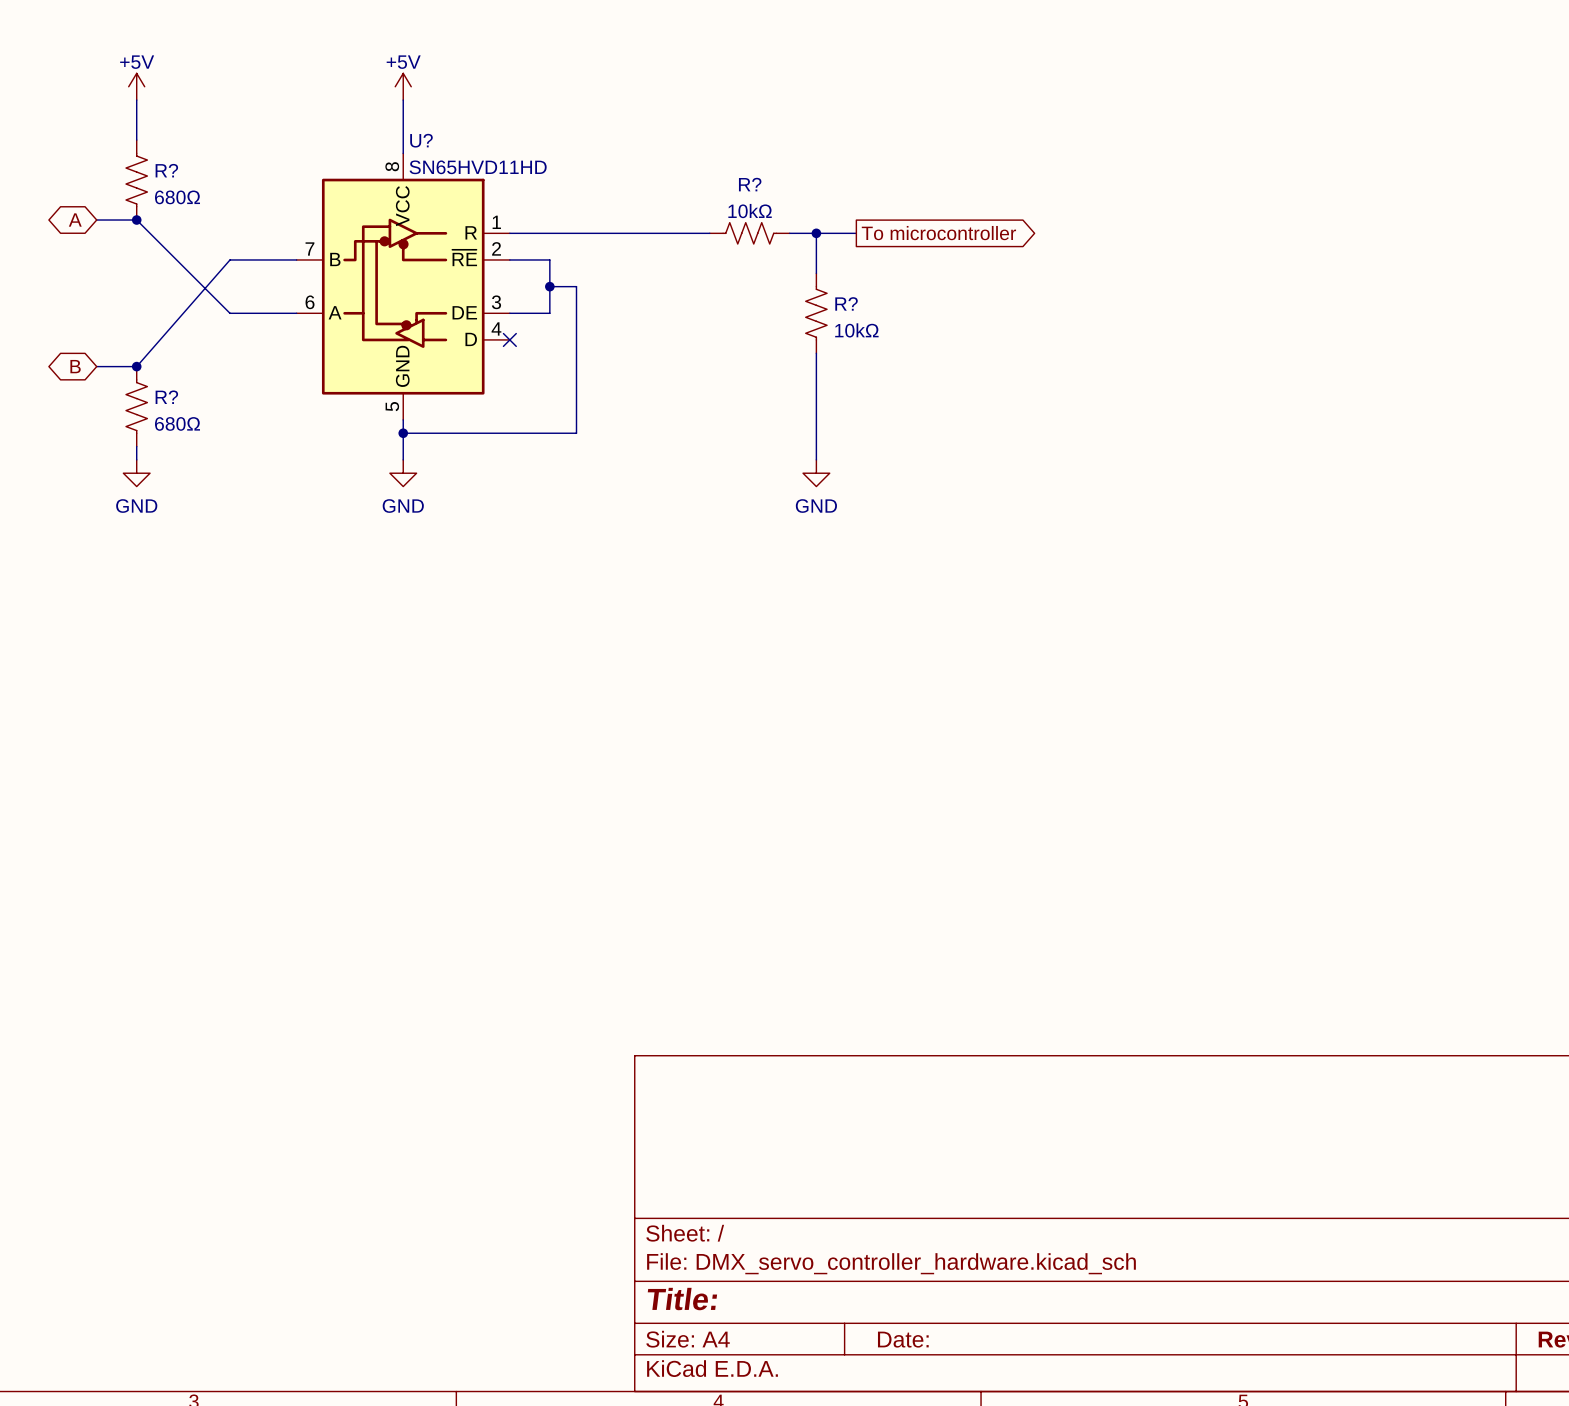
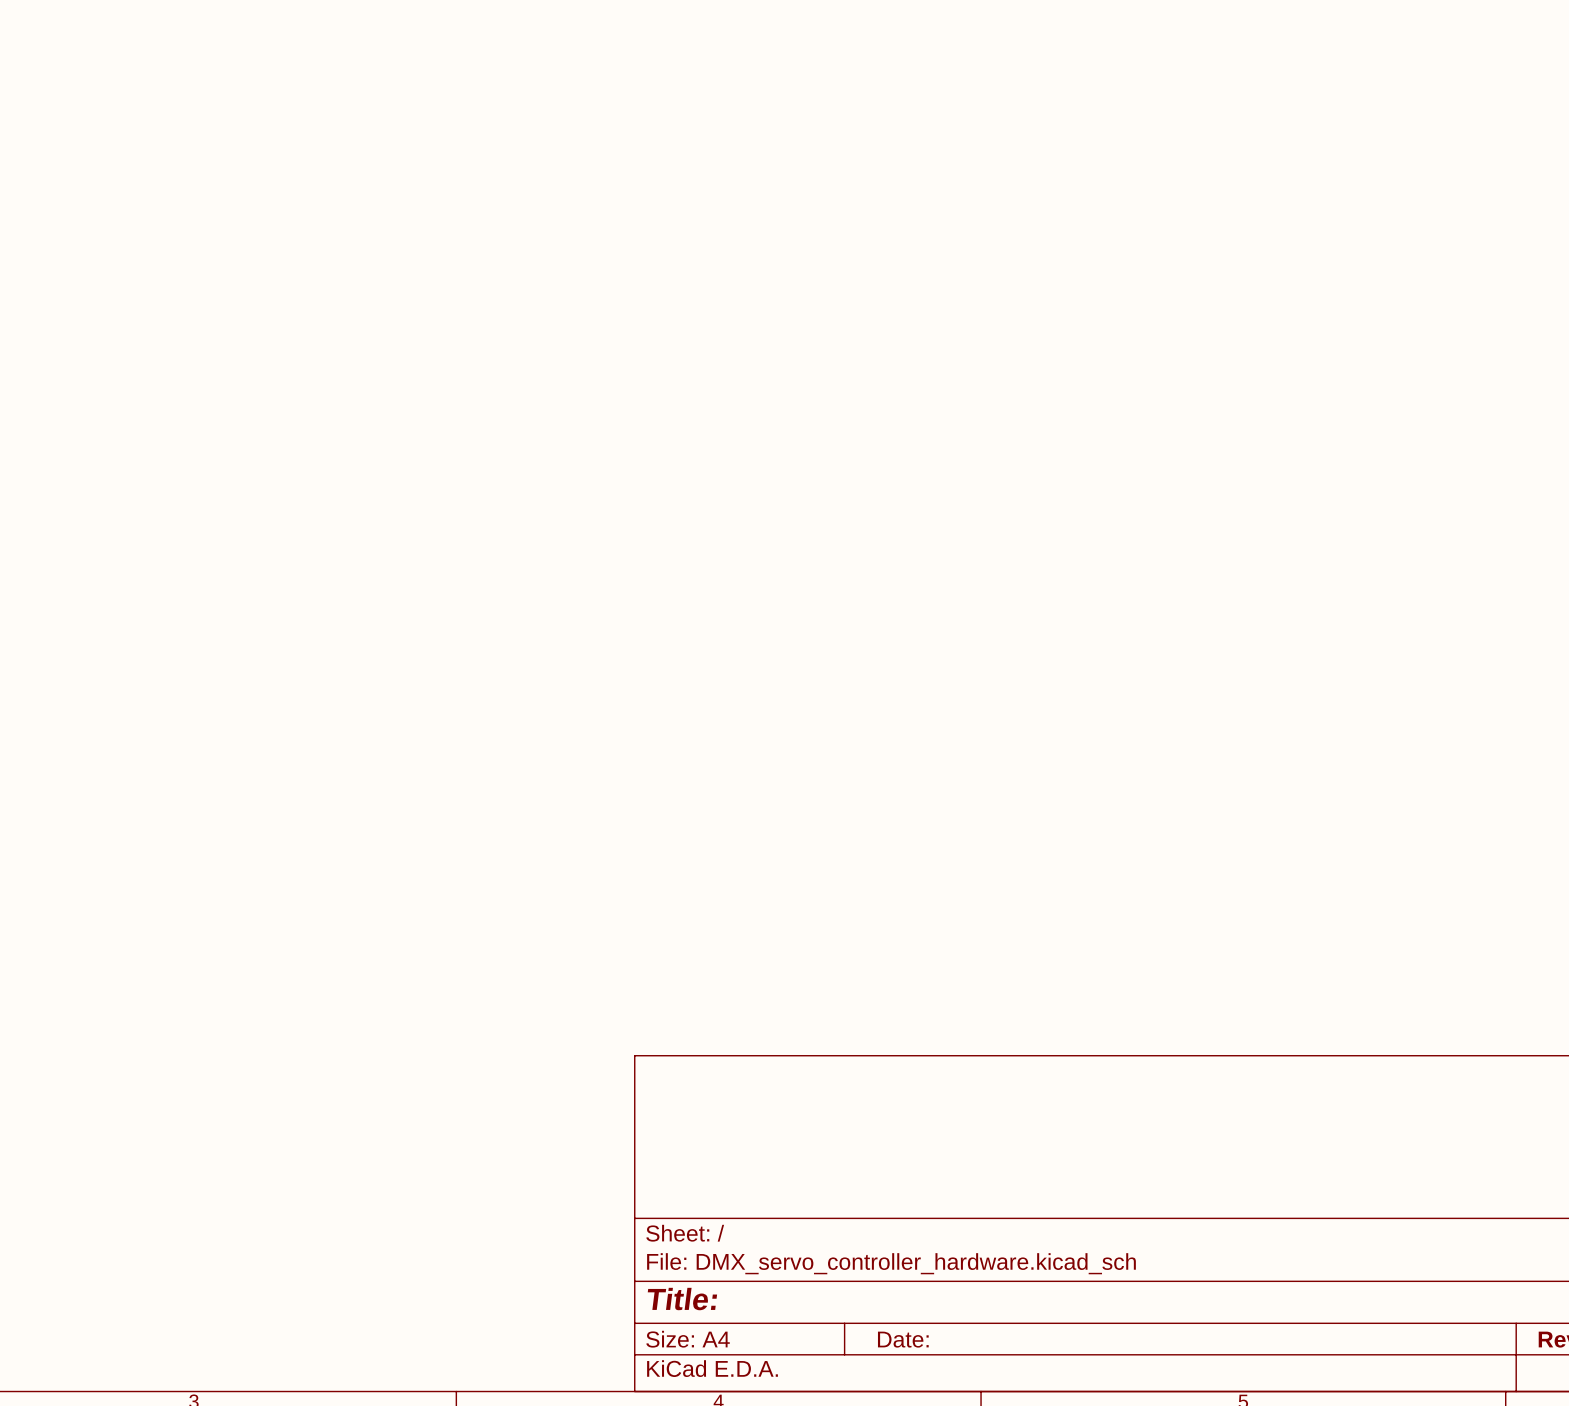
power symbol: +5V (136, 86) -> none
power symbol: +5V (403, 86) -> none
wire: (136, 100) (136, 140) -> none
wire: (403, 100) (403, 153) -> none
R?: 680Ω (136, 180) -> none
global label: A (75, 220) -> none
wire: (96, 220) (136, 220) (229, 313) (296, 313) -> none
junction: (136, 220) -> none
wire: (509, 233) (709, 233) -> none
R?: 10kΩ (749, 233) -> none
wire: (789, 233) (856, 233) -> none
wire: (816, 233) (816, 273) -> none
junction: (816, 233) -> none
global label: To microcontroller (938, 233) -> none
wire: (296, 259) (229, 259) (136, 366) (96, 366) -> none
wire: (509, 259) (549, 259) (549, 313) (509, 313) -> none
U?: SN65HVD11HD (403, 286) -> none
wire: (549, 286) (576, 286) (576, 433) (403, 433) -> none
junction: (549, 286) -> none
R?: 10kΩ (816, 313) -> none
no-connect mark: (509, 339) -> none
wire: (816, 353) (816, 459) -> none
global label: B (75, 366) -> none
junction: (136, 366) -> none
R?: 680Ω (136, 406) -> none
wire: (403, 419) (403, 459) -> none
junction: (403, 433) -> none
wire: (136, 446) (136, 459) -> none
power symbol: GND (136, 473) -> none
power symbol: GND (403, 473) -> none
power symbol: GND (816, 473) -> none

